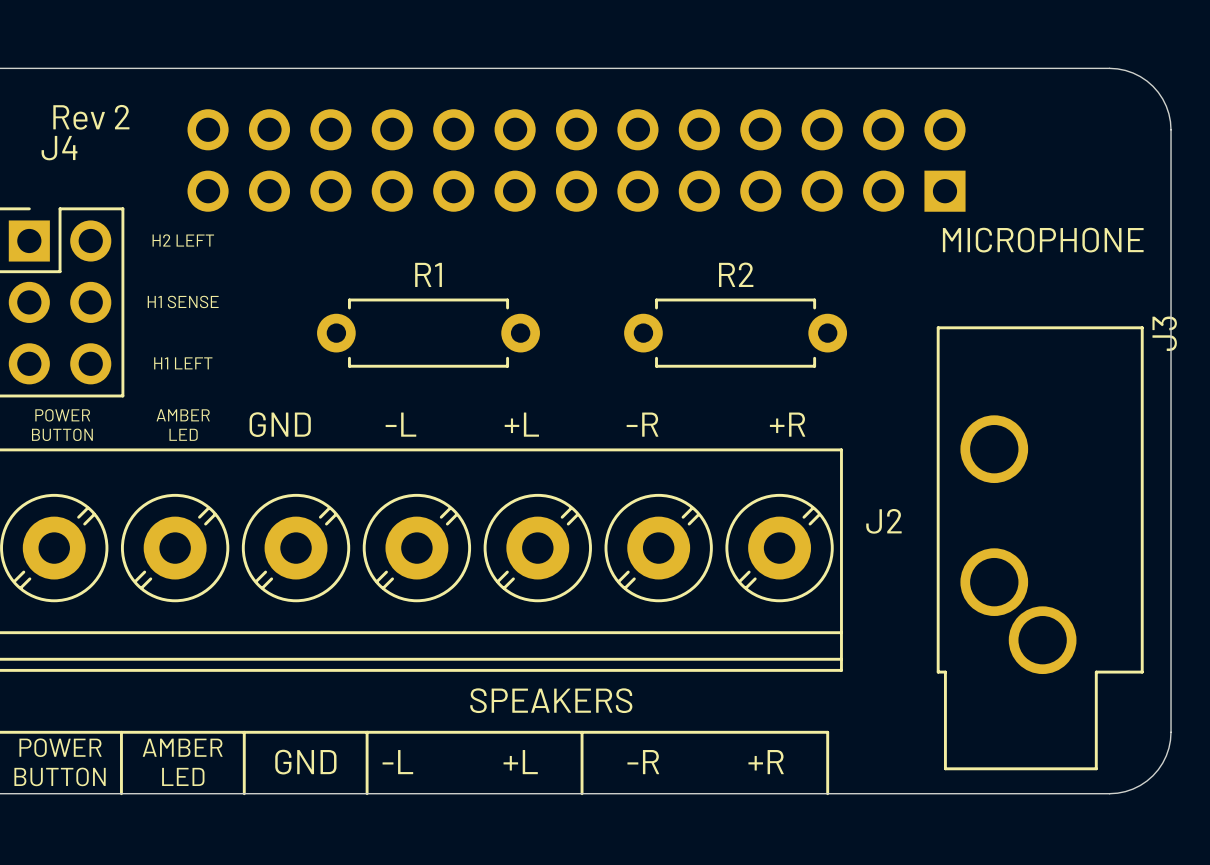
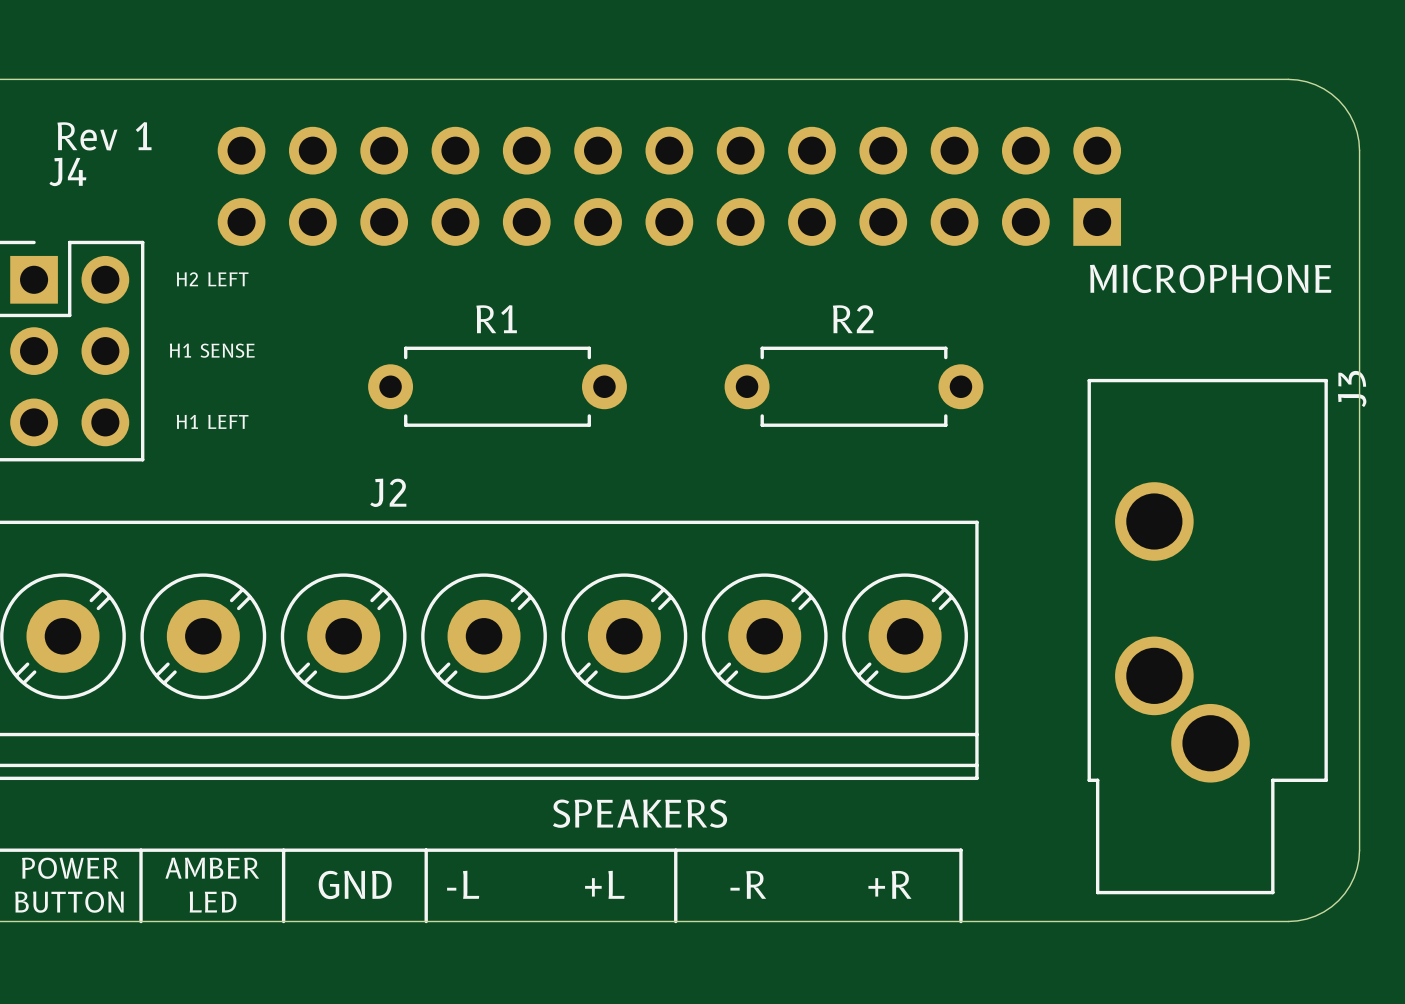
text: Rev 2 (91, 117) -> Rev 1 (104, 136)
text: POWER (62, 415) -> none
text: AMBER (183, 415) -> none
text: GND (280, 424) -> none
text: -L (400, 424) -> none
text: +L (521, 424) -> none
text: -R (642, 424) -> none
text: +R (787, 424) -> none
text: BUTTON (62, 434) -> none
text: LED (183, 434) -> none
J2 name position: J2 (883, 521) -> J2 (388, 492)

